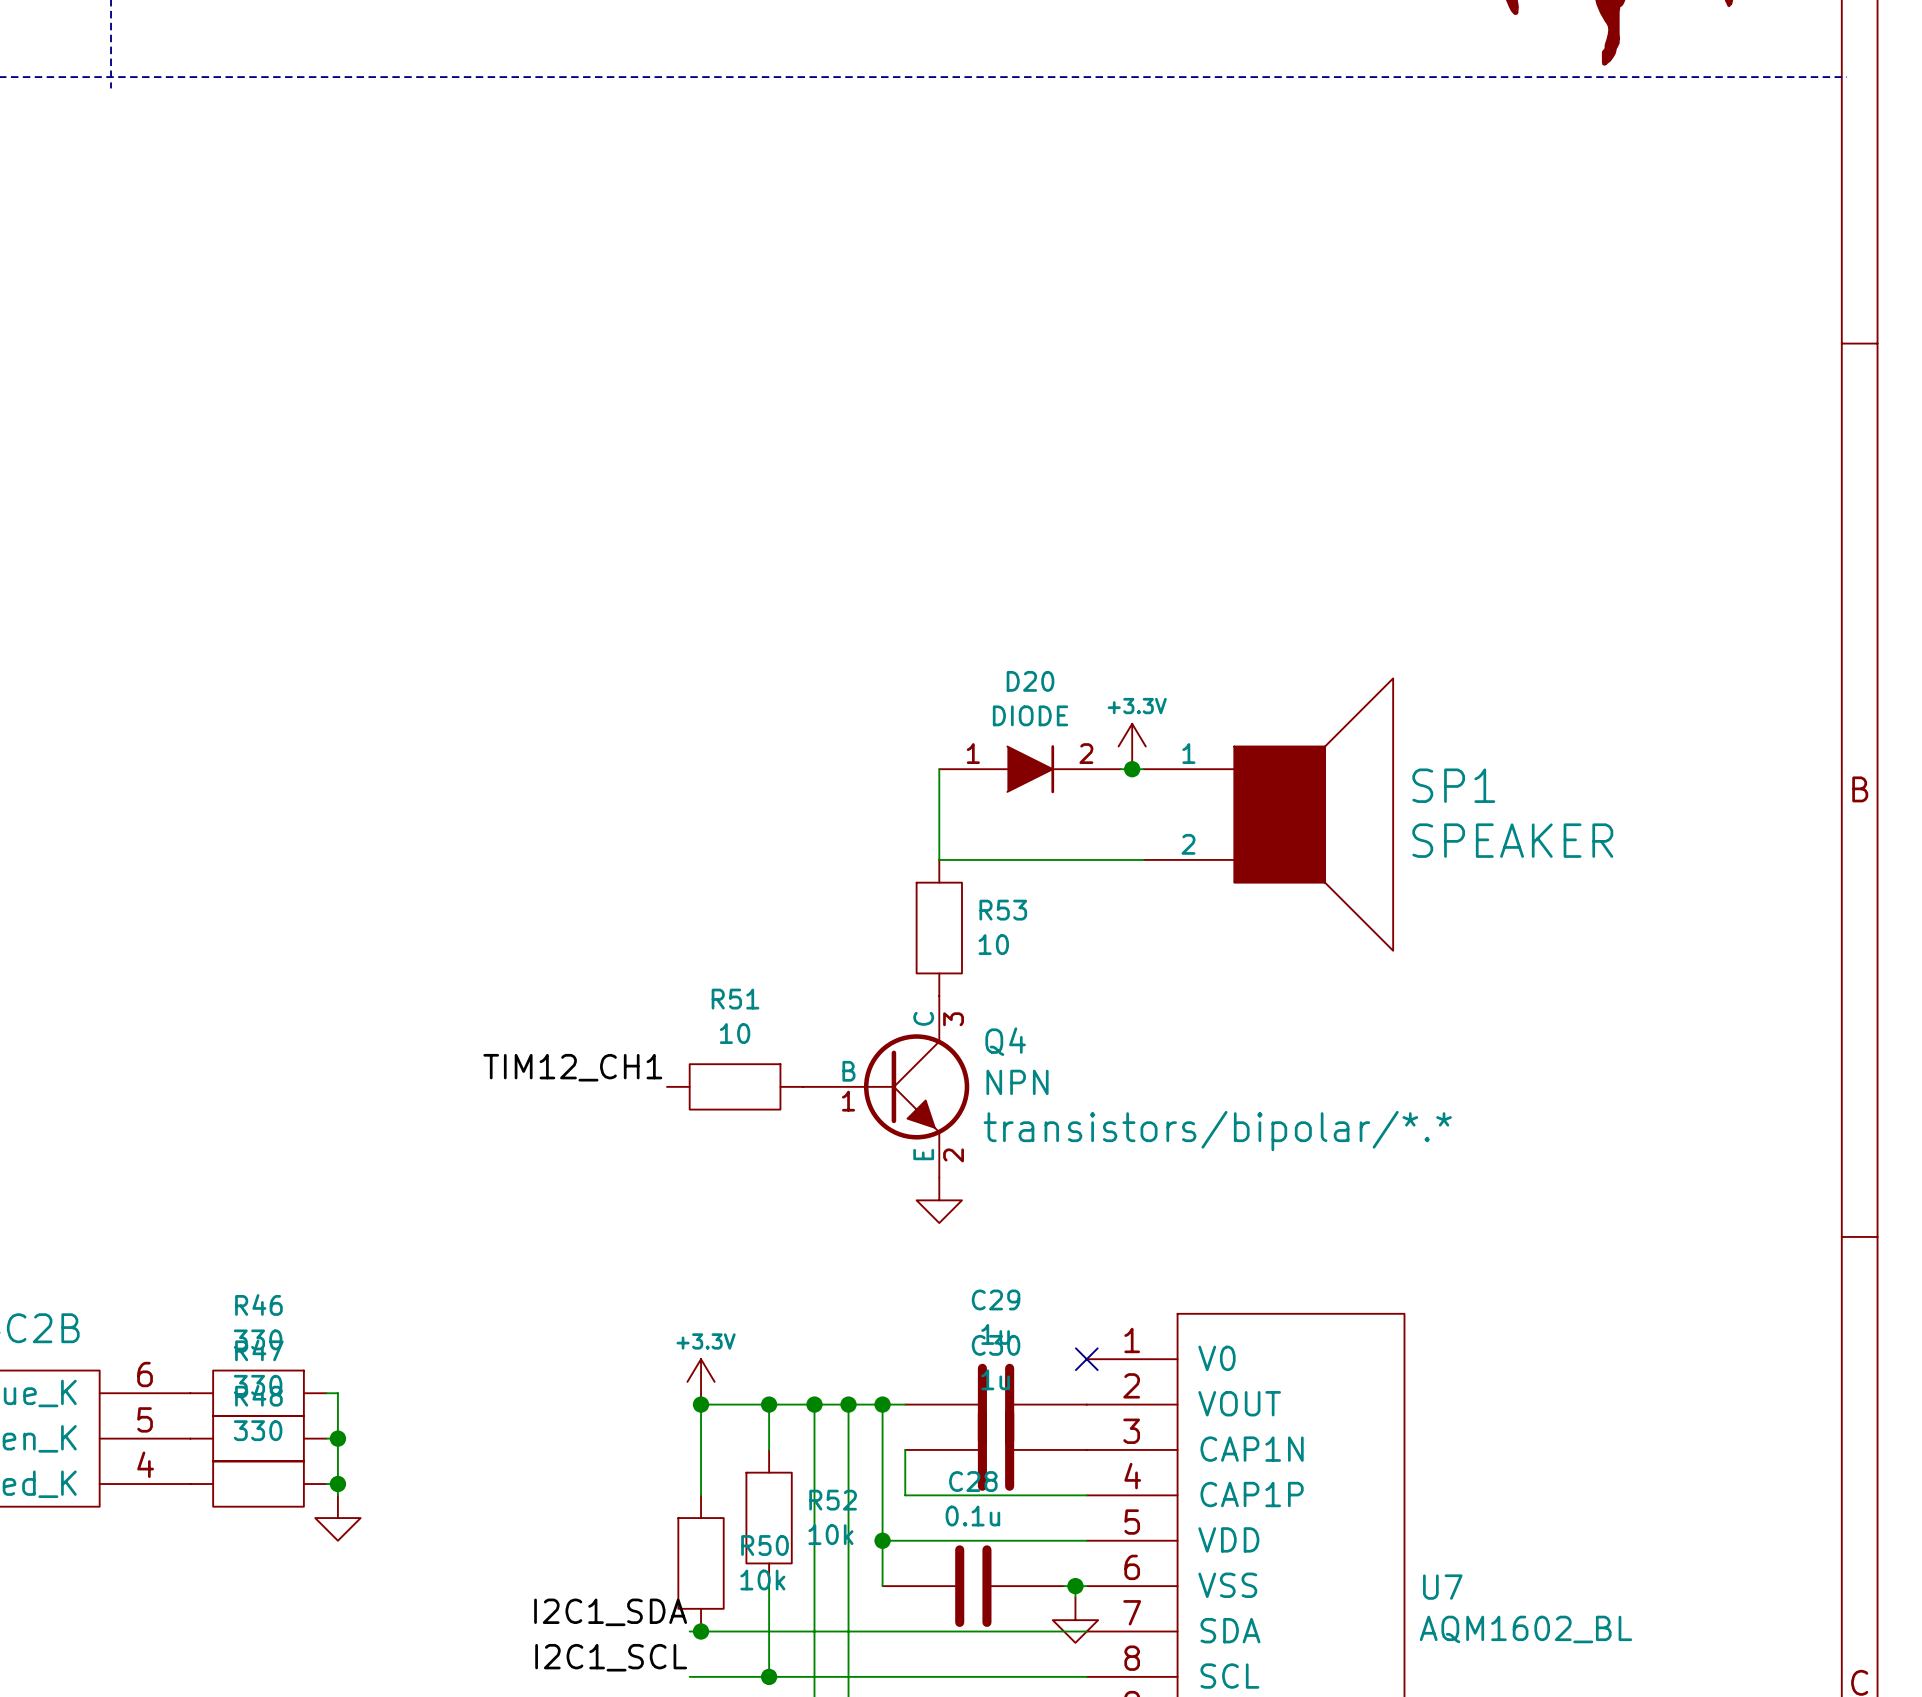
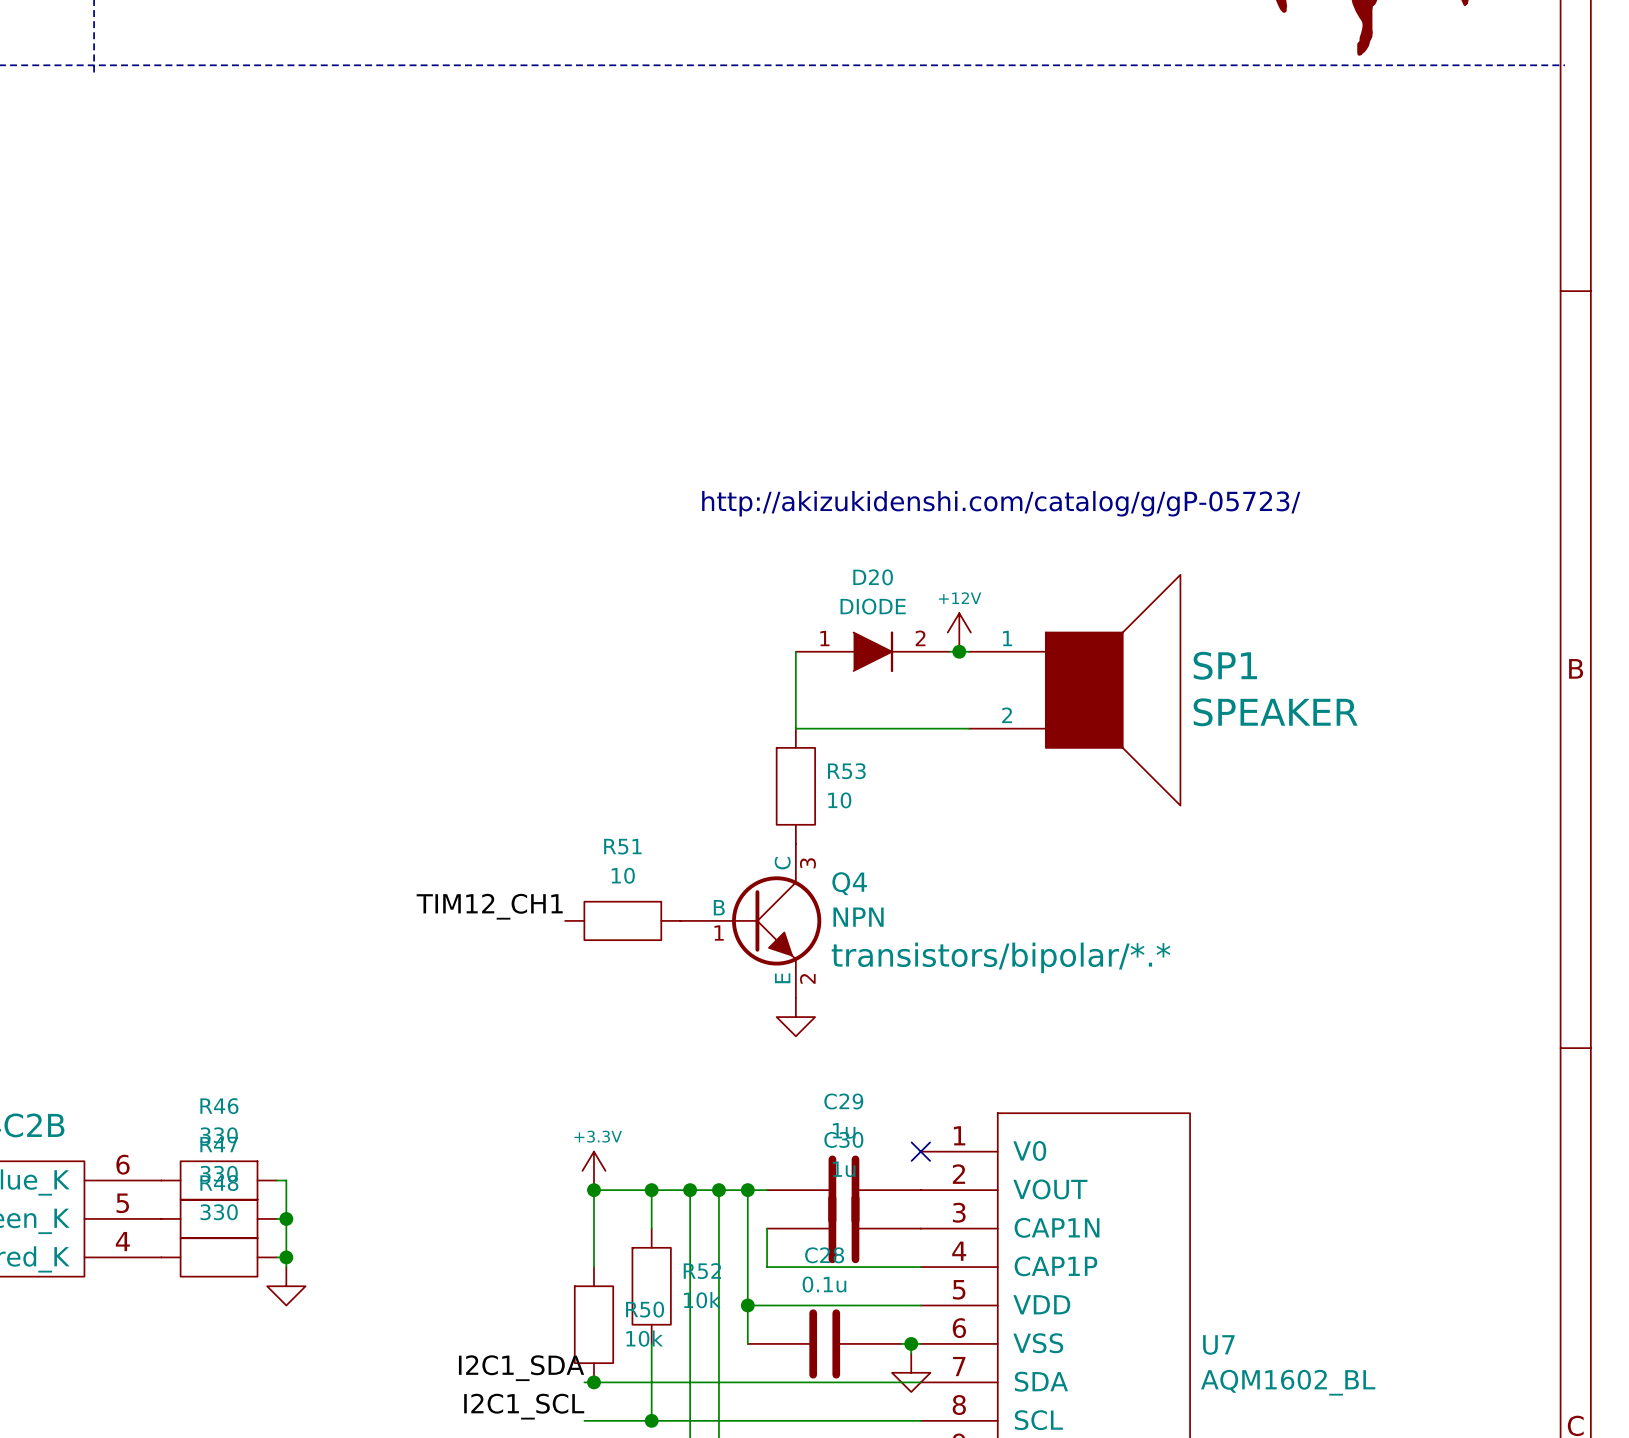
text: none -> http://akizukidenshi.com/catalog/g/gP-05723/ (1001, 503)
power symbol: +3.3V (1132, 746) -> +12V (959, 632)

